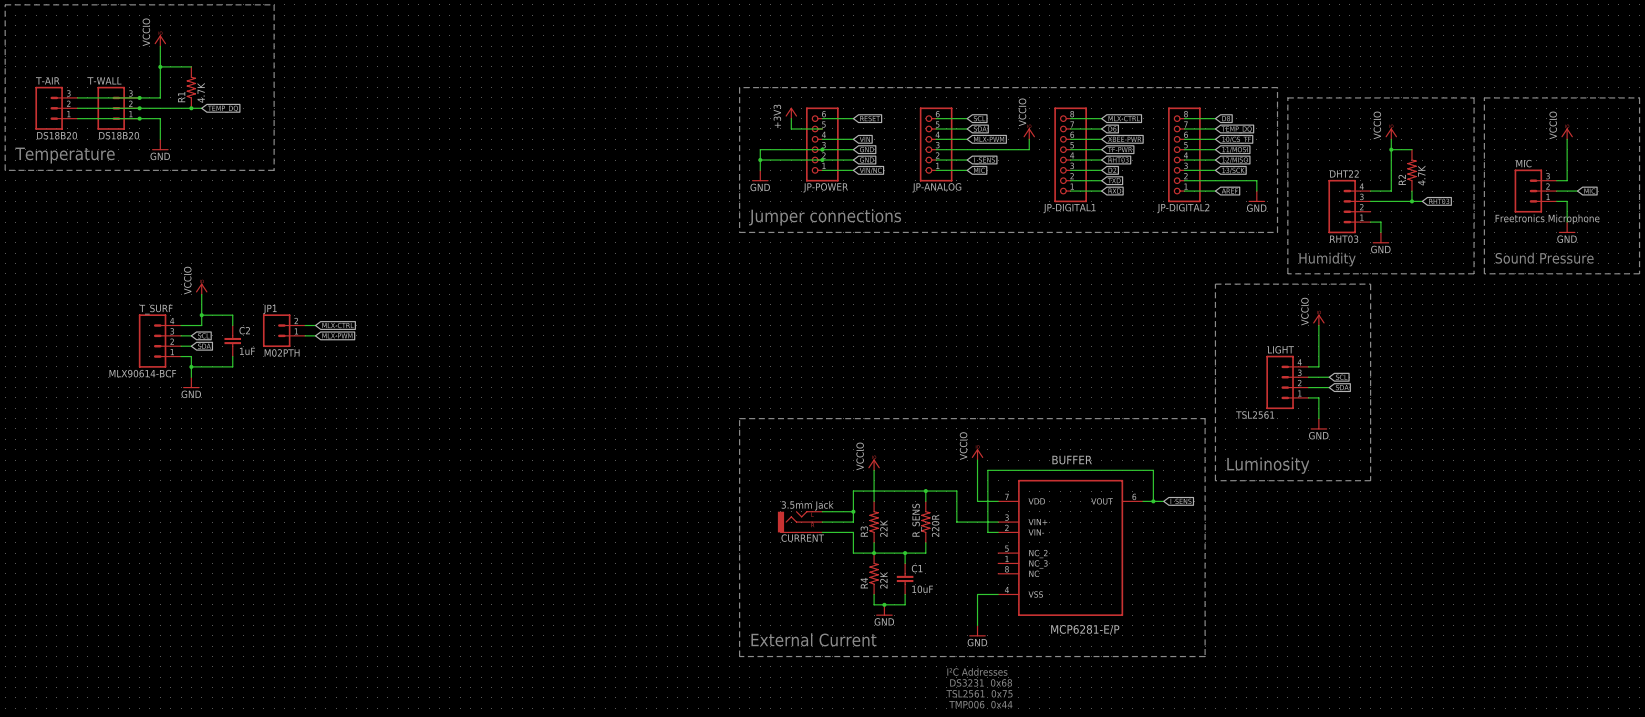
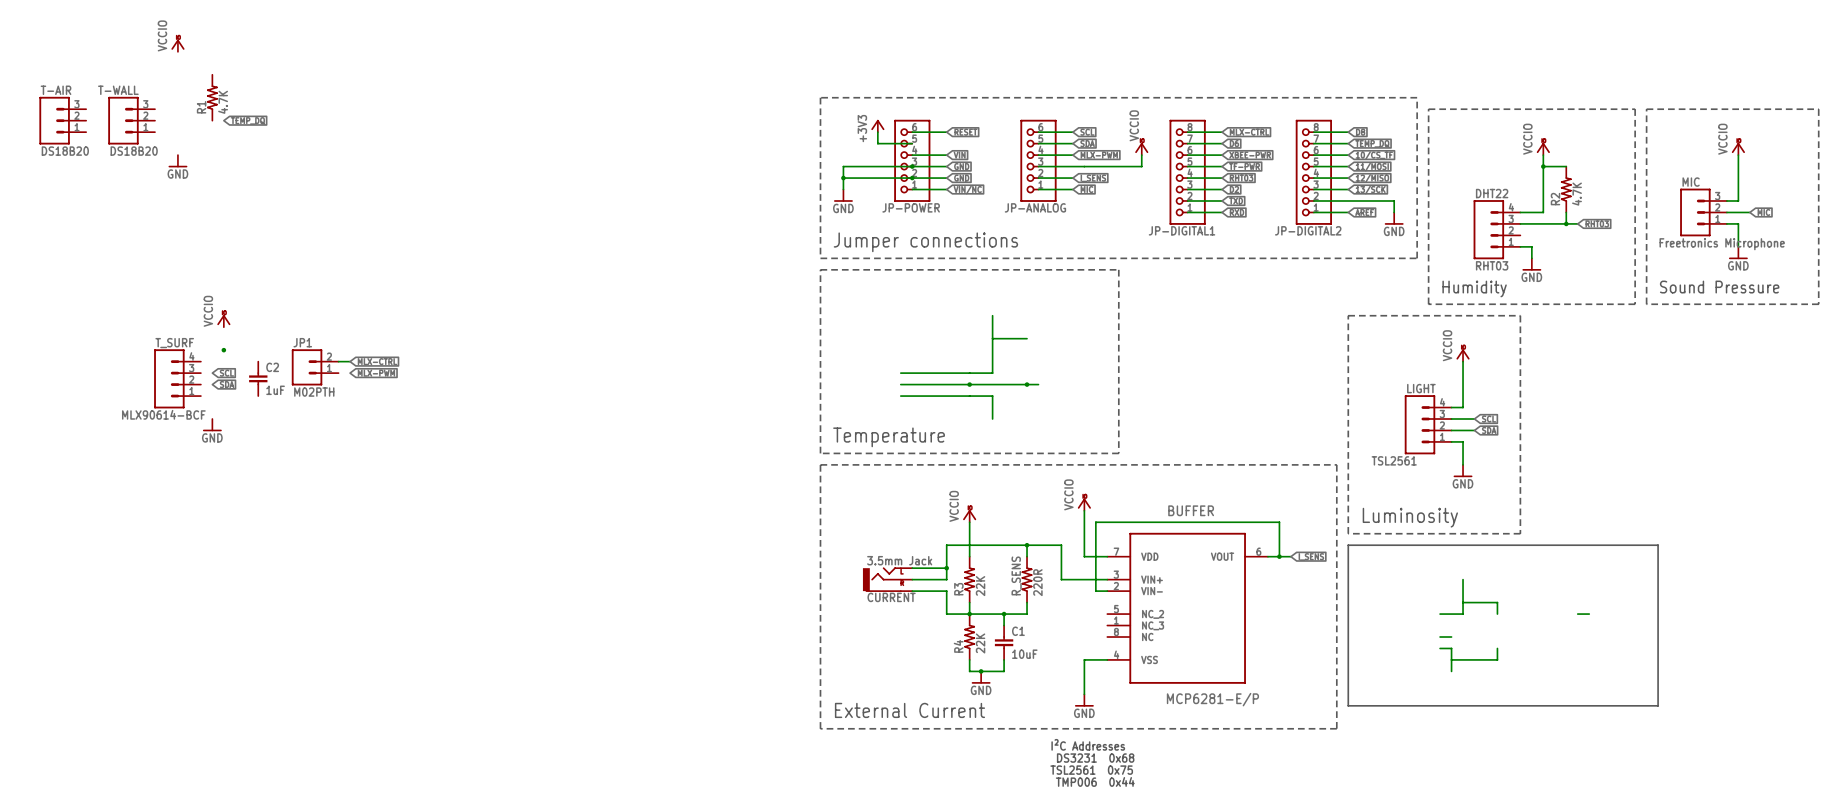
line: (5, 4) (274, 4) (274, 170) (5, 170) (5, 4) -> none
wire: (160, 46) (160, 97) (77, 97) -> none
wire: (160, 66) (191, 66) -> none
junction: (160, 66) -> none
junction: (139, 97) -> none
wire: (77, 108) (201, 108) -> none
junction: (139, 108) -> none
junction: (191, 108) -> none
wire: (77, 118) (160, 118) (160, 139) -> none
junction: (139, 118) -> none
text: Temperature (65, 155) -> none
line: none -> (820, 269) (820, 453) (1118, 453) (1118, 269) (820, 269)
wire: none -> (992, 315) (992, 373) (900, 373)
wire: (201, 294) (201, 325) (181, 325) -> none
wire: none -> (992, 338) (1027, 338)
wire: (201, 315) (232, 315) (232, 325) -> none
wire: (181, 335) (191, 335) -> none
wire: (305, 335) (315, 335) -> none
wire: (181, 346) (191, 346) -> none
wire: none -> (900, 384) (1038, 384)
junction: none -> (969, 384)
junction: none -> (1027, 384)
wire: (181, 356) (191, 356) (191, 377) -> none
wire: (232, 356) (232, 366) (191, 366) -> none
wire: none -> (900, 396) (992, 396) (992, 419)
junction: (191, 366) -> none
text: none -> Temperature (889, 437)
line: none -> (1348, 545) (1658, 545) (1658, 705) (1348, 705) (1348, 545)
wire: none -> (1463, 579) (1463, 614) (1440, 614)
wire: none -> (1463, 602) (1497, 602) (1497, 614)
wire: none -> (1577, 614) (1589, 614)
wire: none -> (1440, 637) (1451, 637)
wire: none -> (1440, 648) (1451, 648) (1451, 671)
wire: none -> (1497, 648) (1497, 659) (1451, 659)

